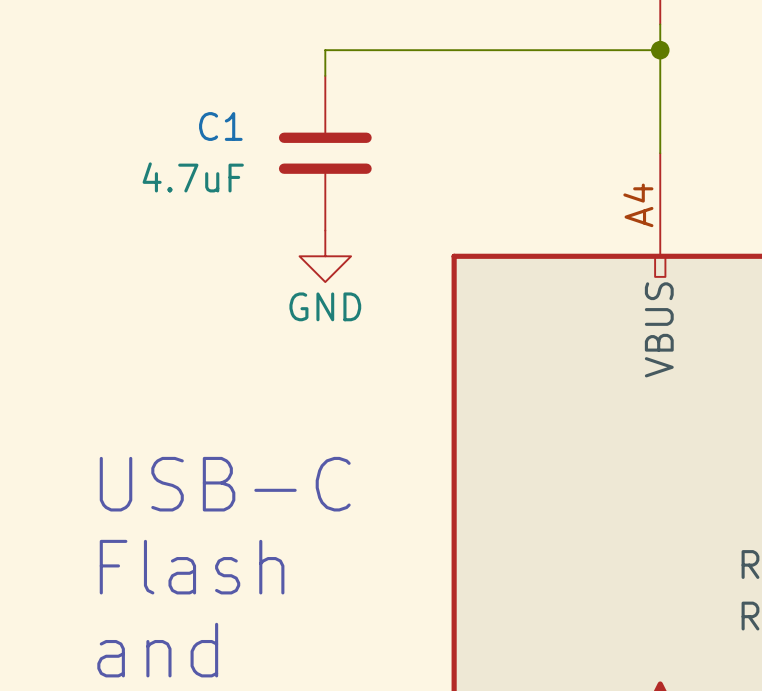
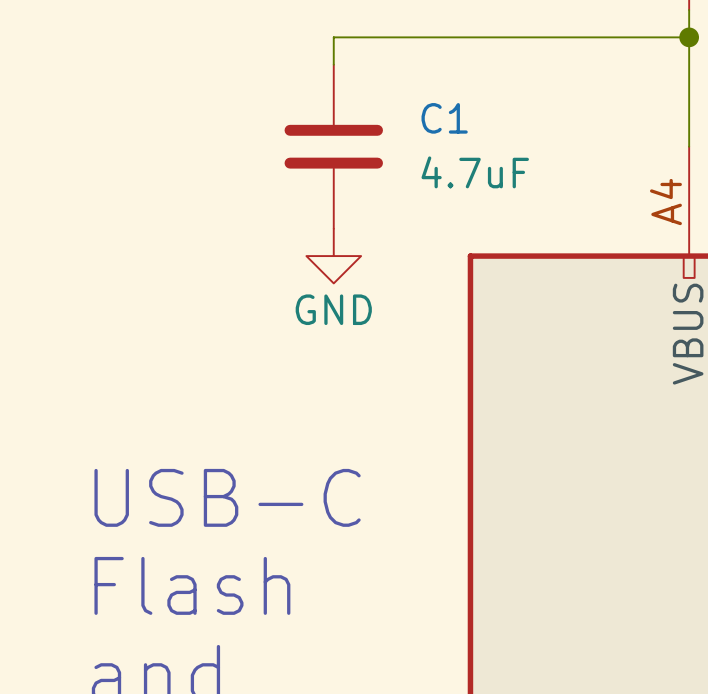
C1 name position: C1 (220, 126) -> C1 (444, 118)
C1 value position: 4.7uF (193, 177) -> 4.7uF (475, 172)

